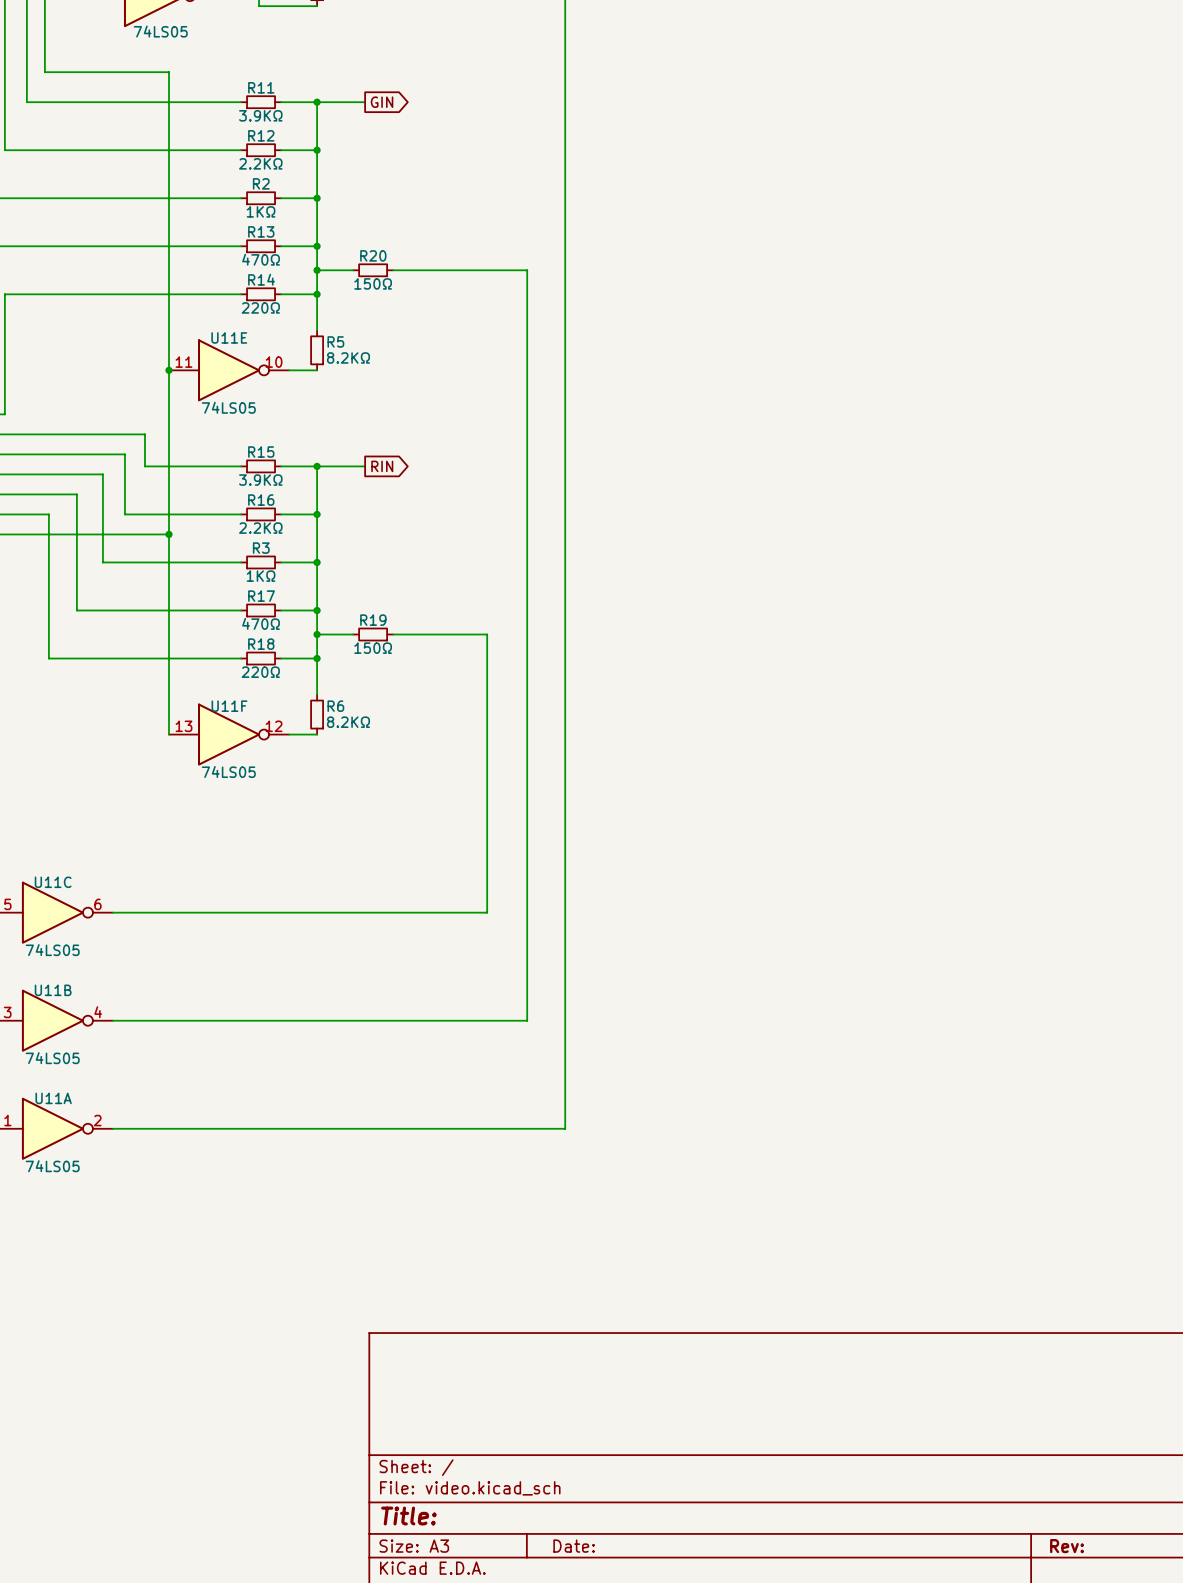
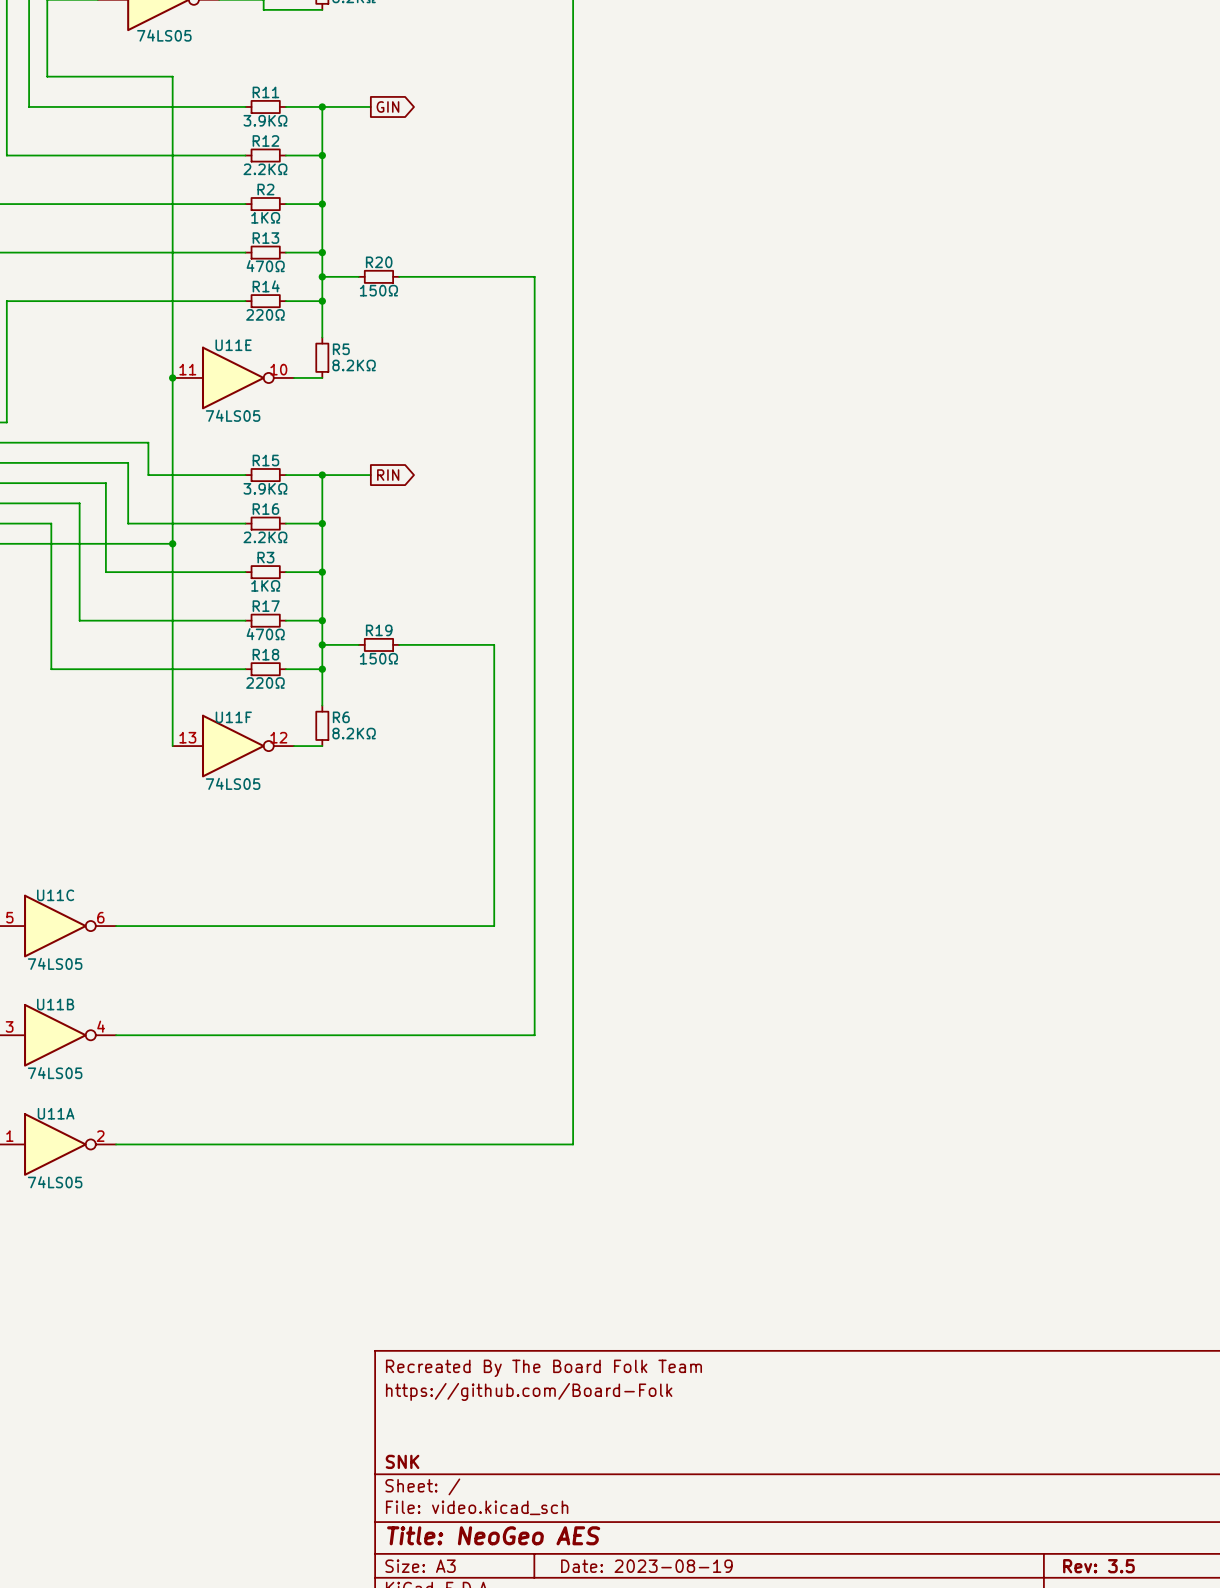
title block: none -> Recreated By The Board Folk Team (543, 1368)
title block: none -> https://github.com/Board-Folk (529, 1391)
title block: none -> SNK (402, 1461)
title block: Title: (408, 1516) -> Title: NeoGeo AES (493, 1535)
title block: Date: (574, 1546) -> Date: 2023-08-19 (646, 1566)
title block: Rev: (1066, 1546) -> Rev: 3.5 (1098, 1566)

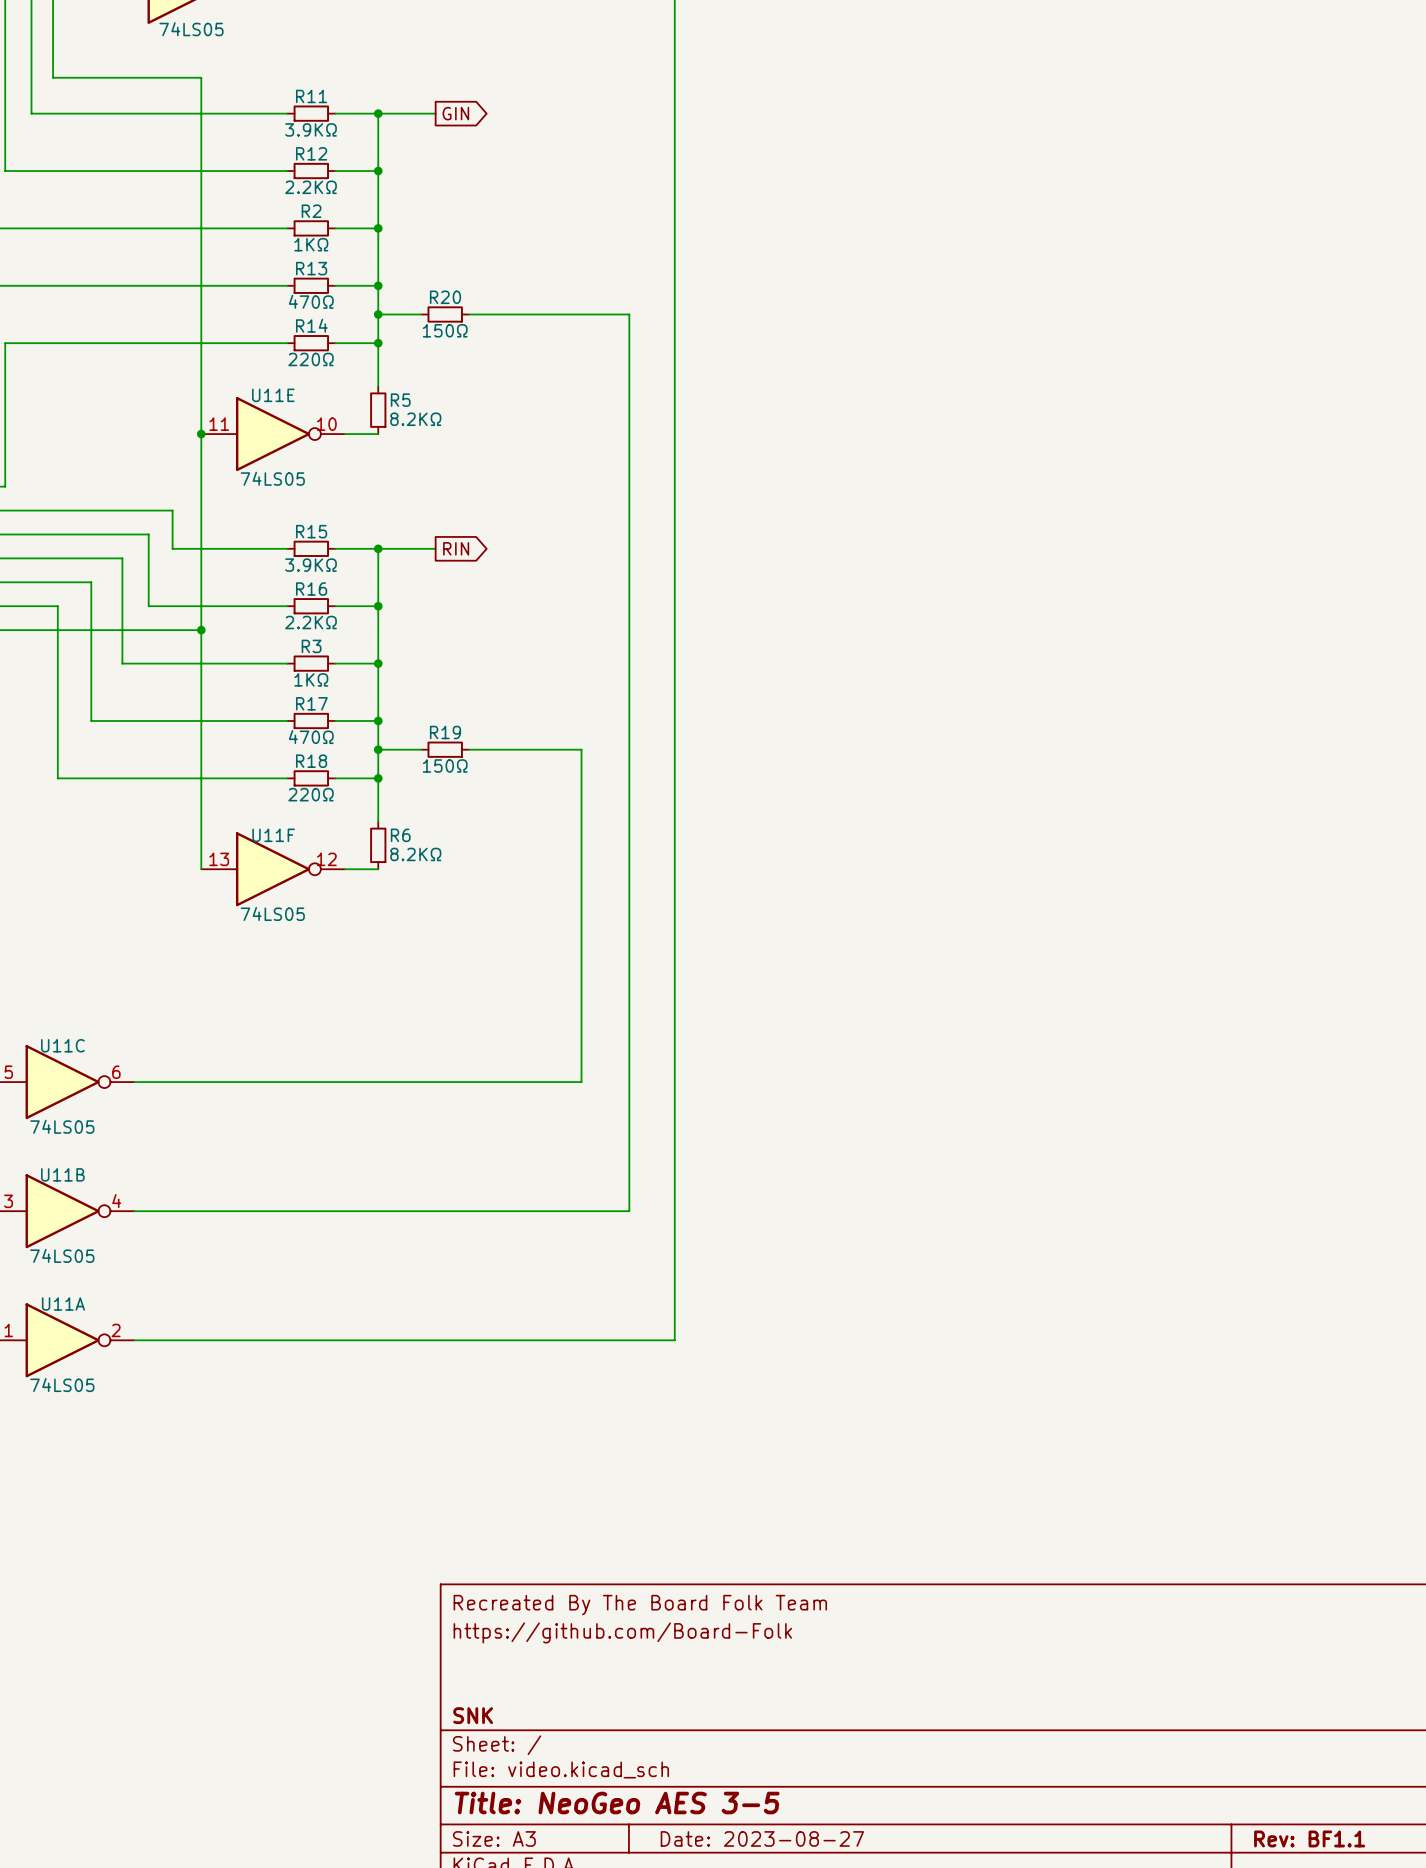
title block: Title: NeoGeo AES (493, 1535) -> Title: NeoGeo AES 3-5 (617, 1803)
title block: Date: 2023-08-19 (646, 1566) -> Date: 2023-08-27 (762, 1838)
title block: Rev: 3.5 (1098, 1566) -> Rev: BF1.1 (1309, 1838)

